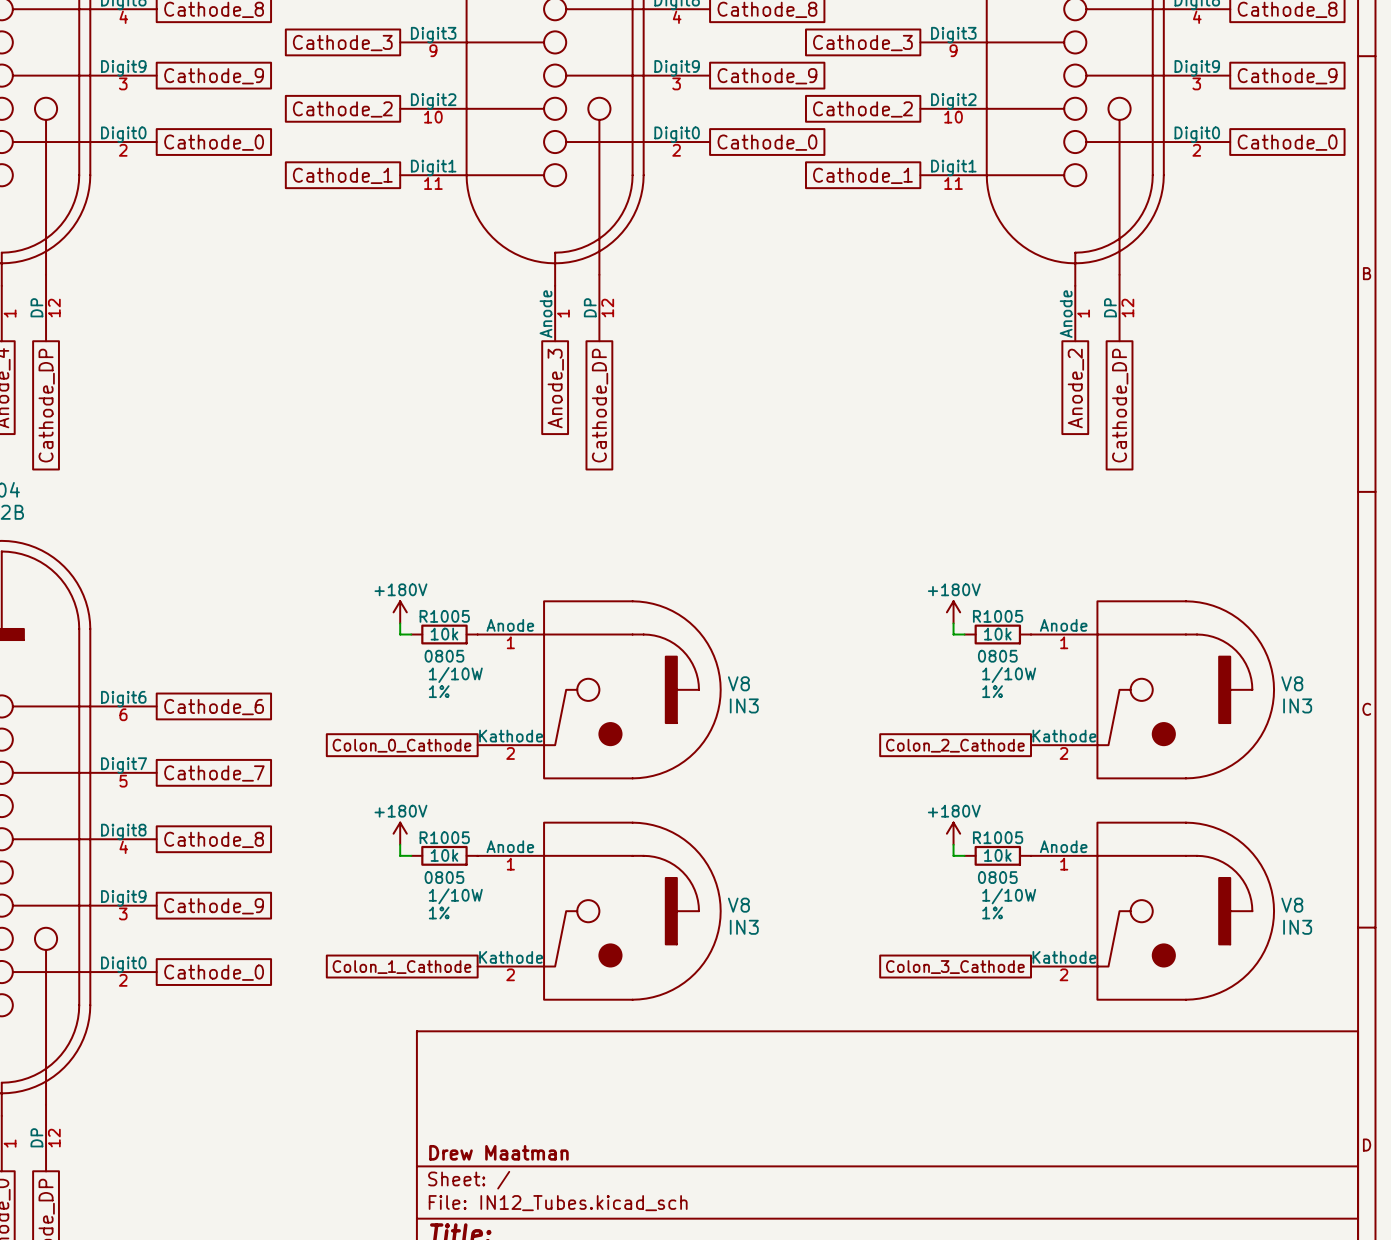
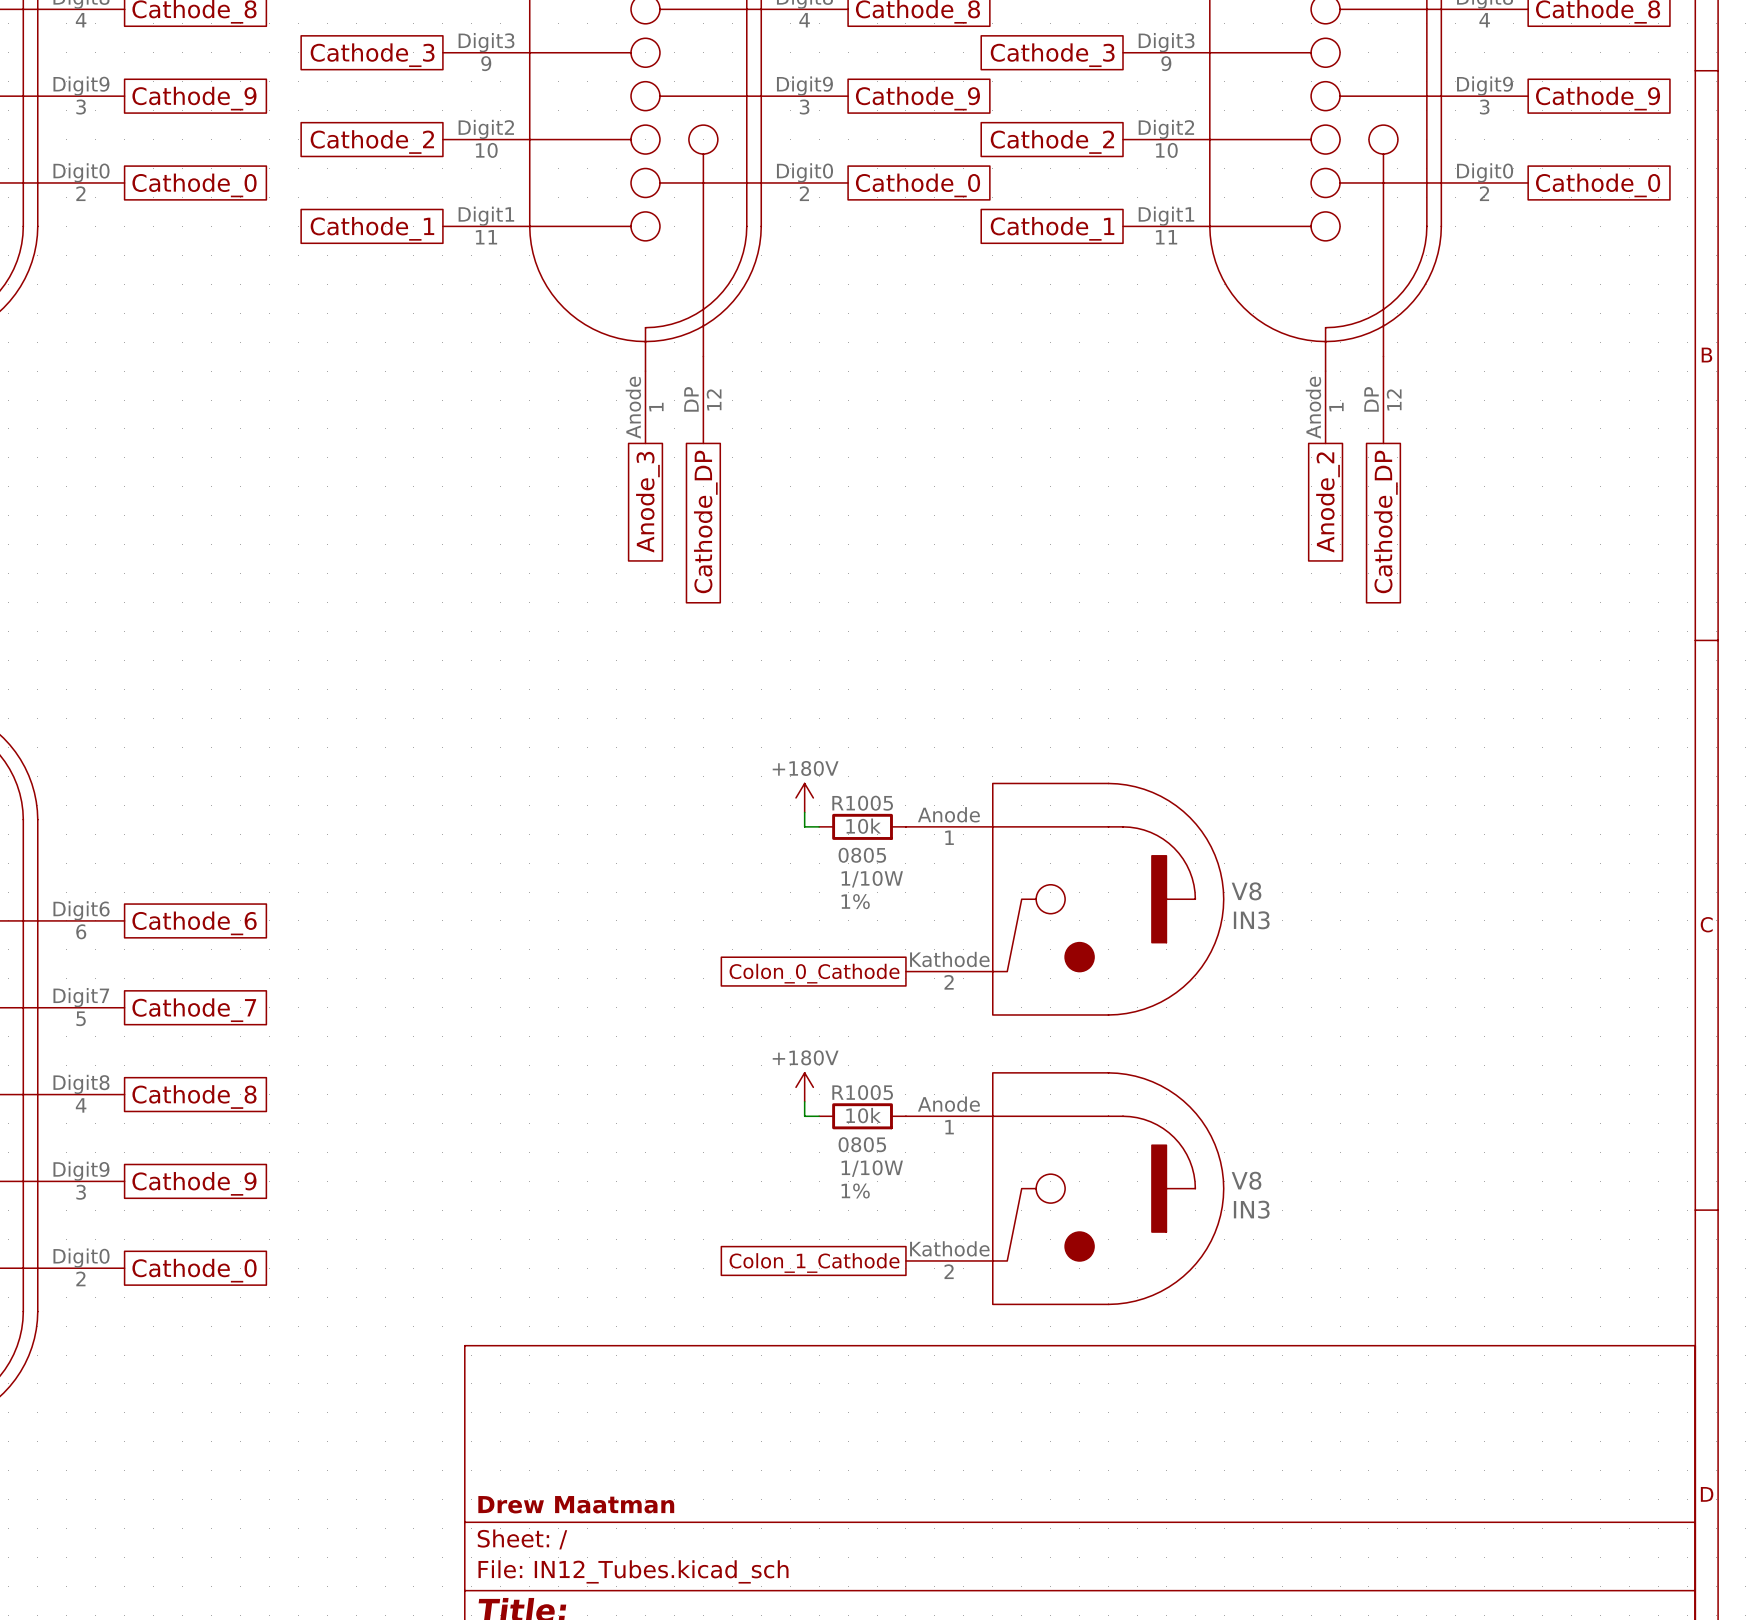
power symbol: +180V (400, 612) -> none
power symbol: none -> +180V (804, 797)
power symbol: +180V (953, 612) -> none
wire: (400, 623) (400, 634) (411, 634) -> none
wire: none -> (804, 812) (804, 826) (819, 826)
wire: (953, 623) (953, 634) (964, 634) -> none
R1005: 10k (444, 634) -> none
R1005: none -> 10k (862, 826)
R1005: 10k (997, 634) -> none
V8: IN3 (599, 689) -> none
V8: none -> IN3 (1064, 899)
V8: IN3 (1152, 689) -> none
global label: Colon_0_Cathode (402, 745) -> none
global label: none -> Colon_0_Cathode (814, 973)
global label: Colon_2_Cathode (955, 745) -> none
power symbol: +180V (400, 833) -> none
power symbol: none -> +180V (804, 1087)
power symbol: +180V (953, 833) -> none
wire: (400, 844) (400, 855) (411, 855) -> none
wire: none -> (804, 1101) (804, 1116) (819, 1116)
wire: (953, 844) (953, 855) (964, 855) -> none
R1005: 10k (444, 855) -> none
R1005: none -> 10k (862, 1116)
R1005: 10k (997, 855) -> none
V8: IN3 (599, 911) -> none
V8: none -> IN3 (1064, 1188)
V8: IN3 (1152, 911) -> none
global label: Colon_1_Cathode (402, 967) -> none
global label: none -> Colon_1_Cathode (814, 1263)
global label: Colon_3_Cathode (955, 967) -> none

